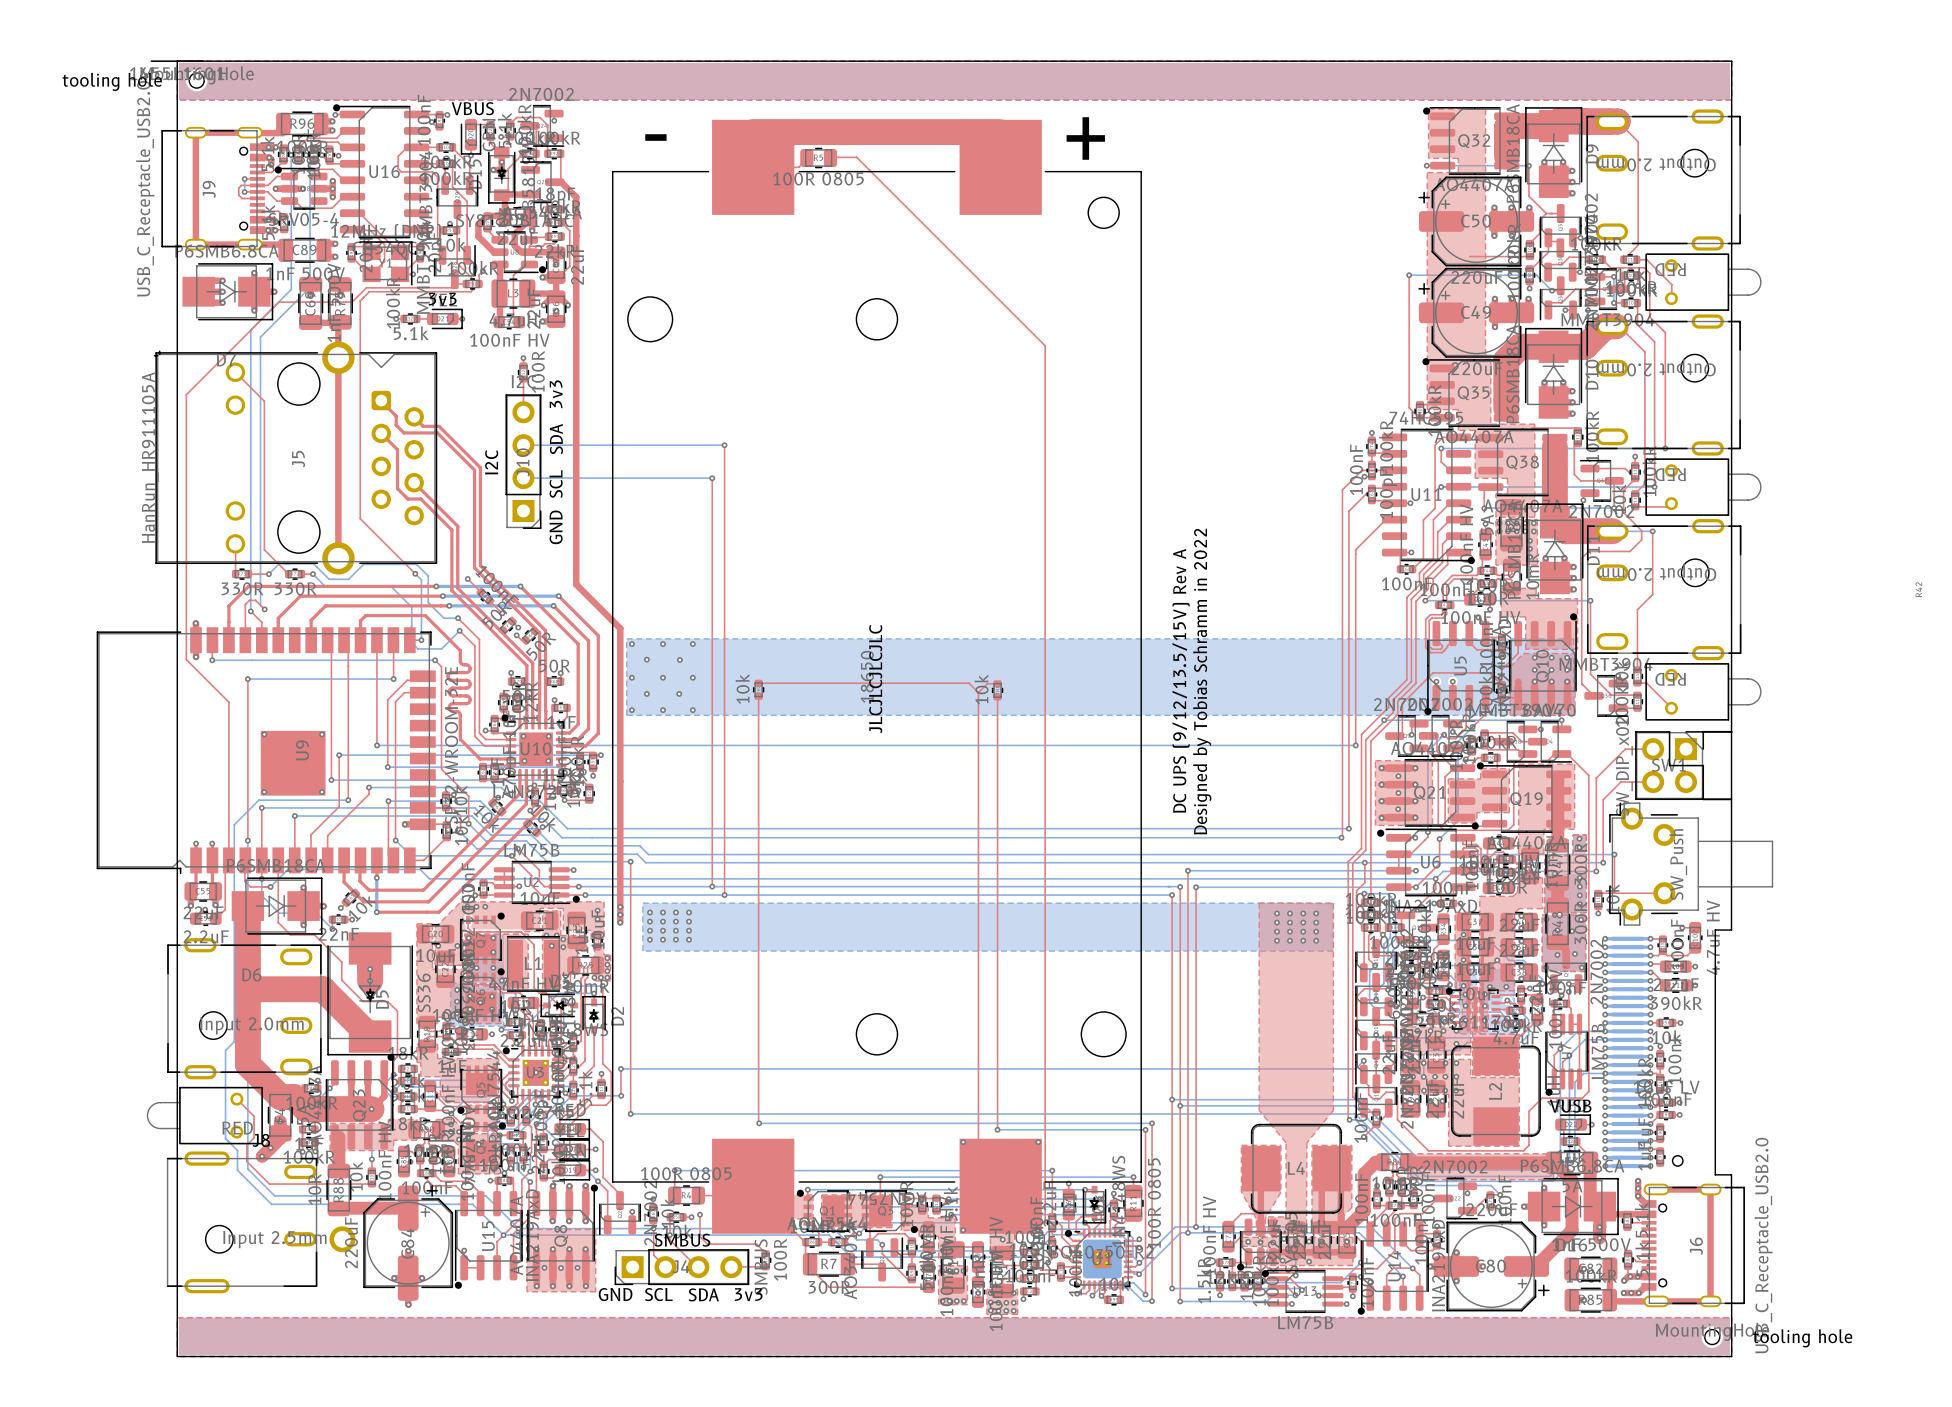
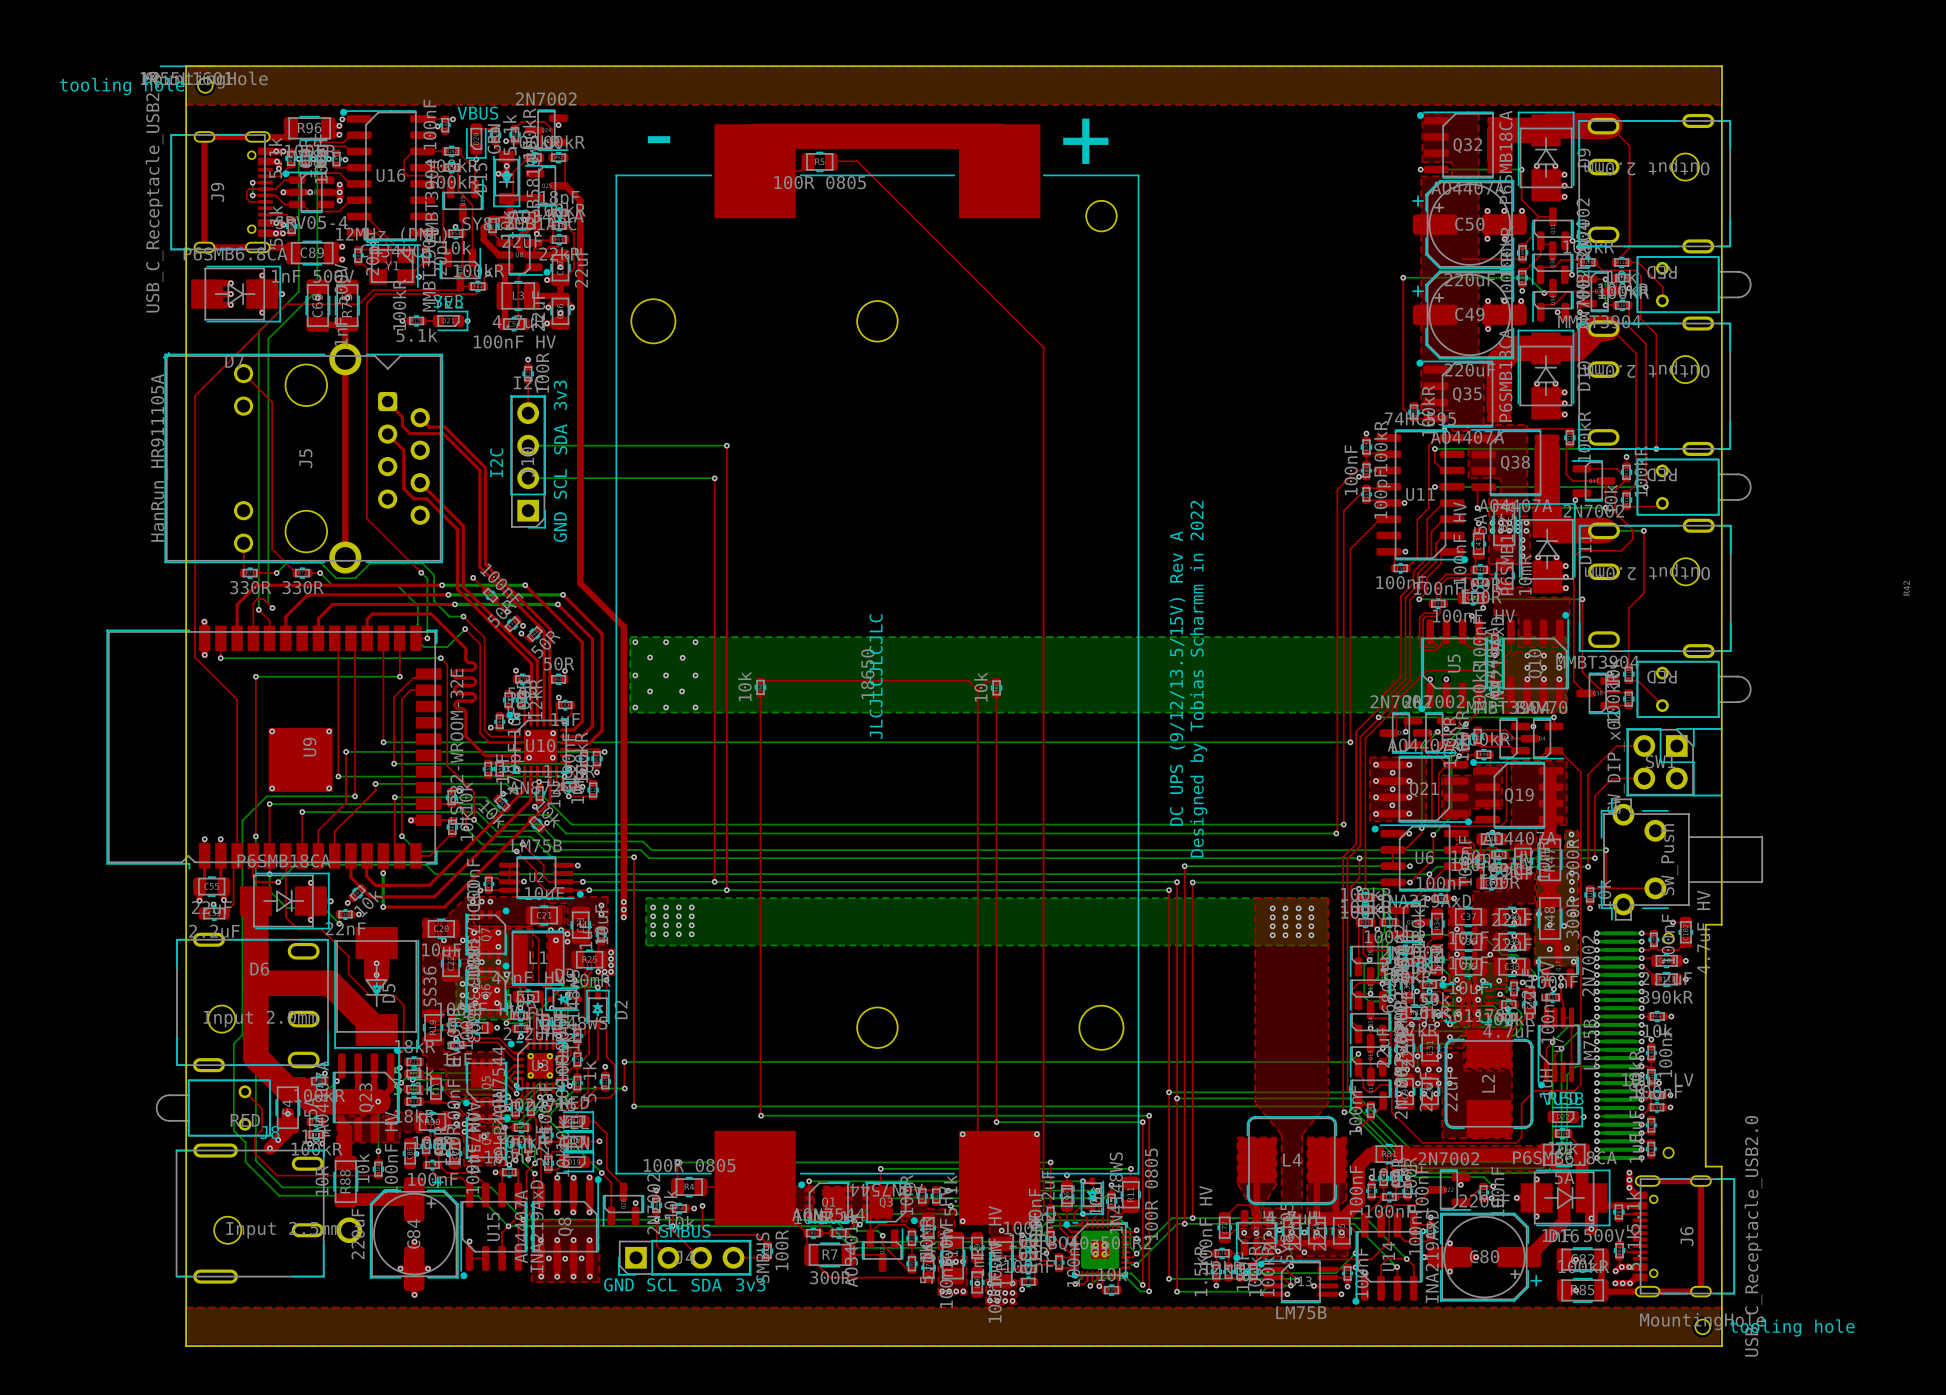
text: Designed by Tobias Schramm in 2022 (1202, 681) -> Designed by Tobias Scharmm in 2022 (1198, 679)

